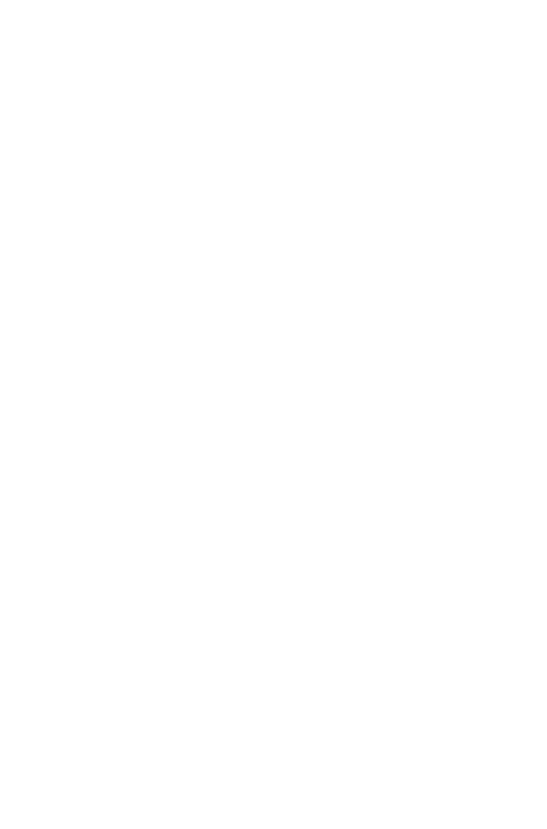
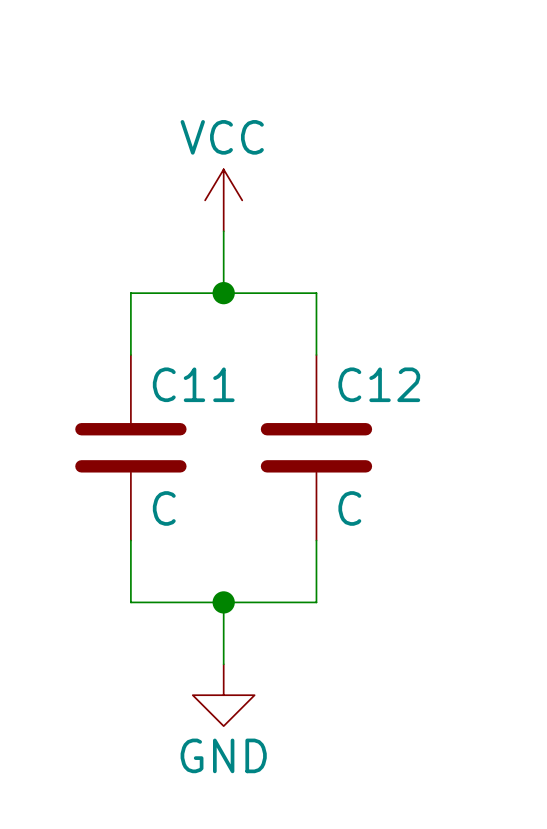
power symbol: none -> VCC (223, 200)
wire: none -> (223, 231) (223, 293)
junction: none -> (223, 293)
wire: none -> (130, 355) (130, 293) (316, 293) (316, 355)
C11: none -> C (130, 447)
C12: none -> C (316, 447)
wire: none -> (130, 540) (130, 602) (316, 602) (316, 540)
wire: none -> (223, 602) (223, 664)
junction: none -> (223, 602)
power symbol: none -> GND (223, 695)

